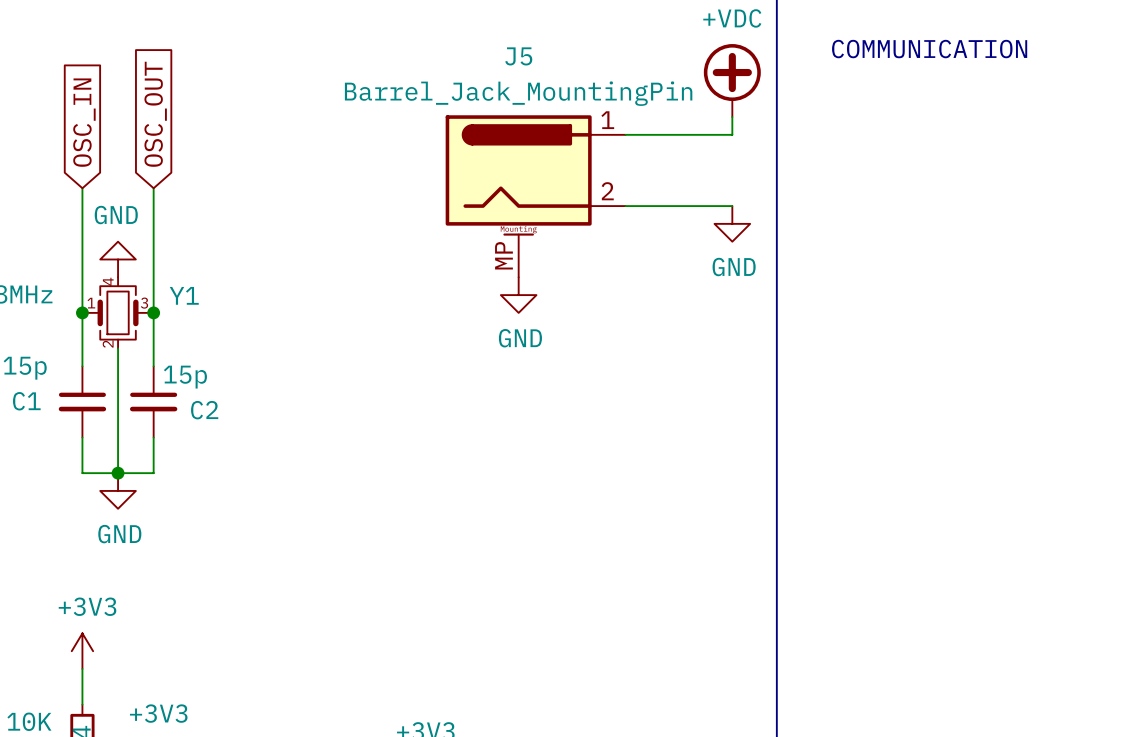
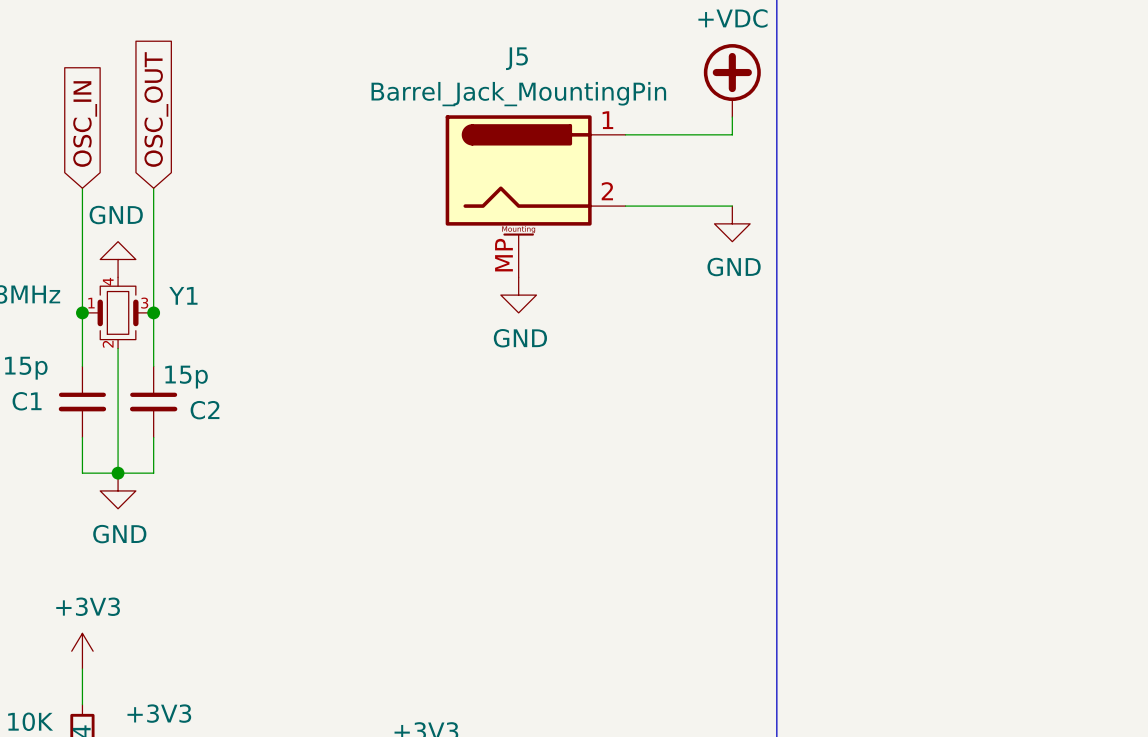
text: COMMUNICATION (929, 49) -> none

